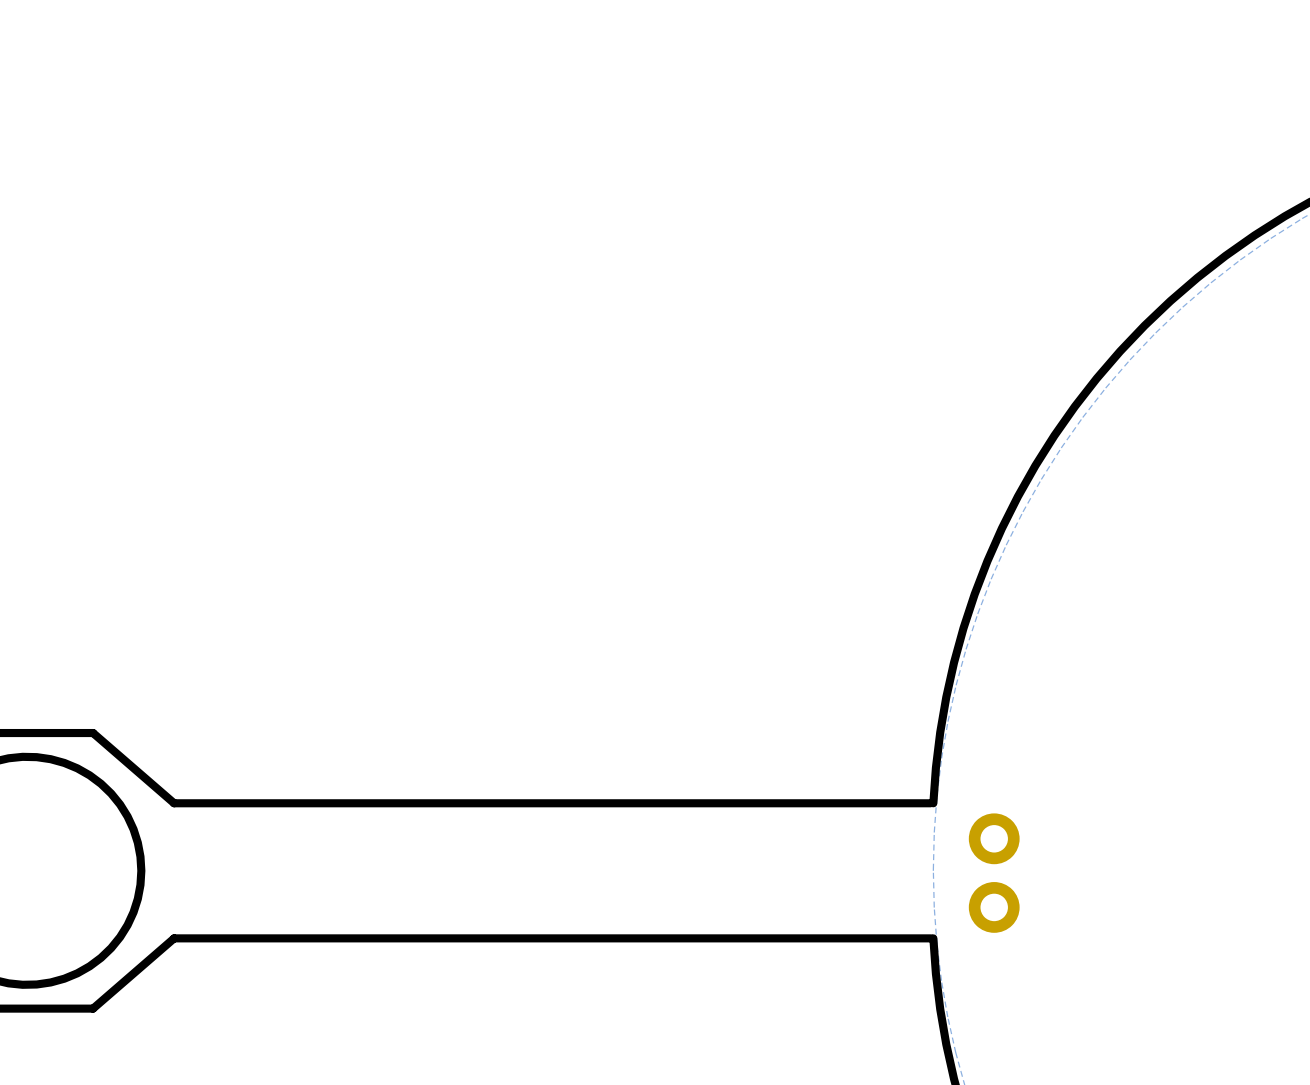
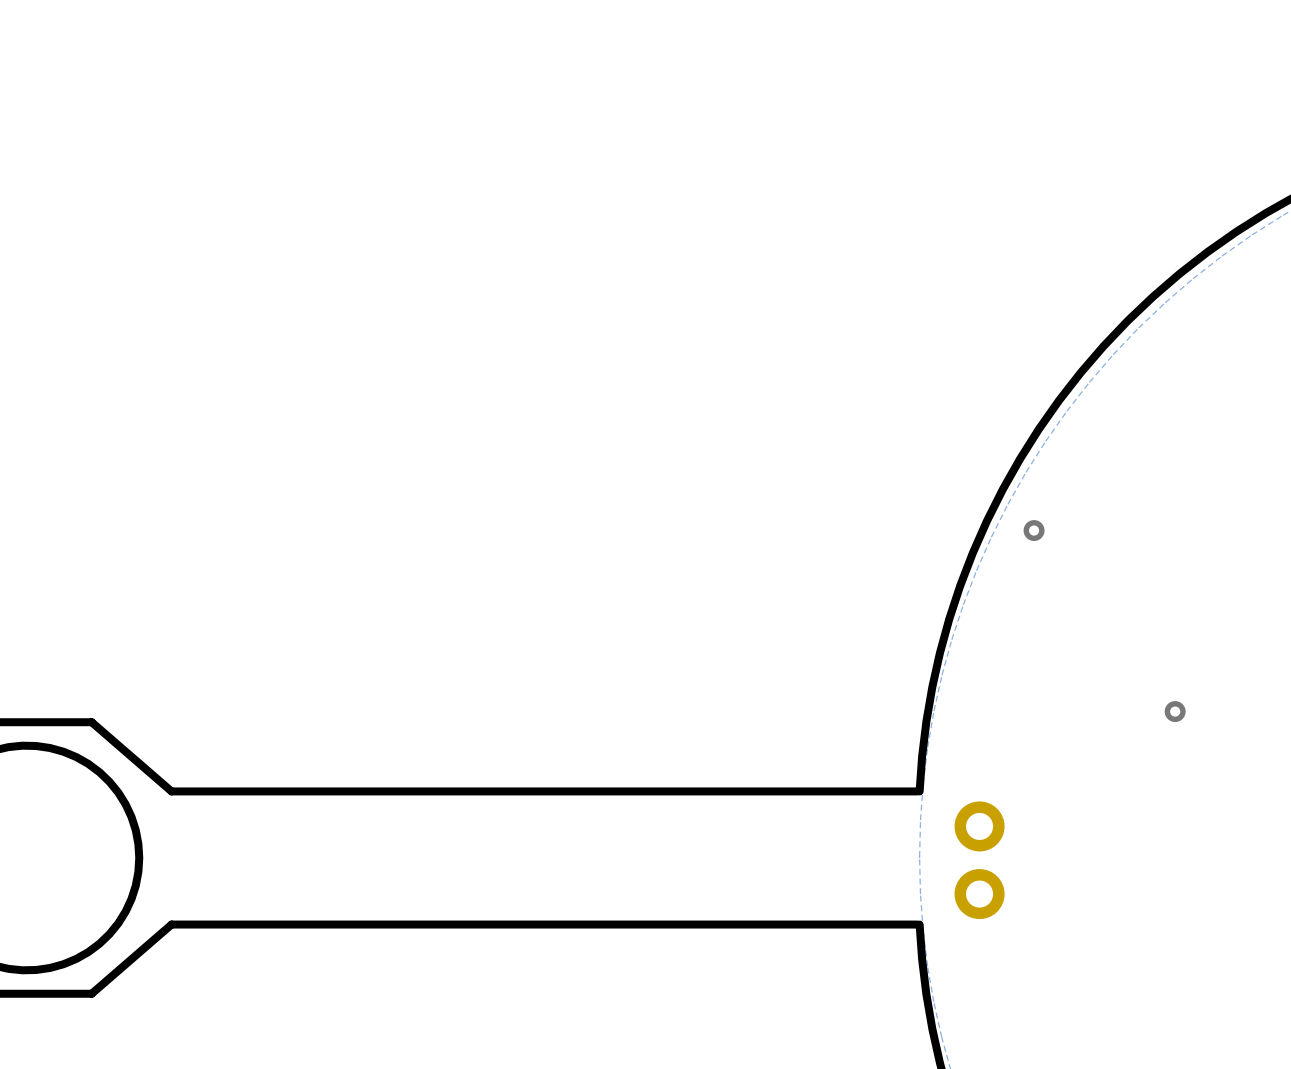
via: none -> (1034, 530)
via: none -> (1175, 711)

